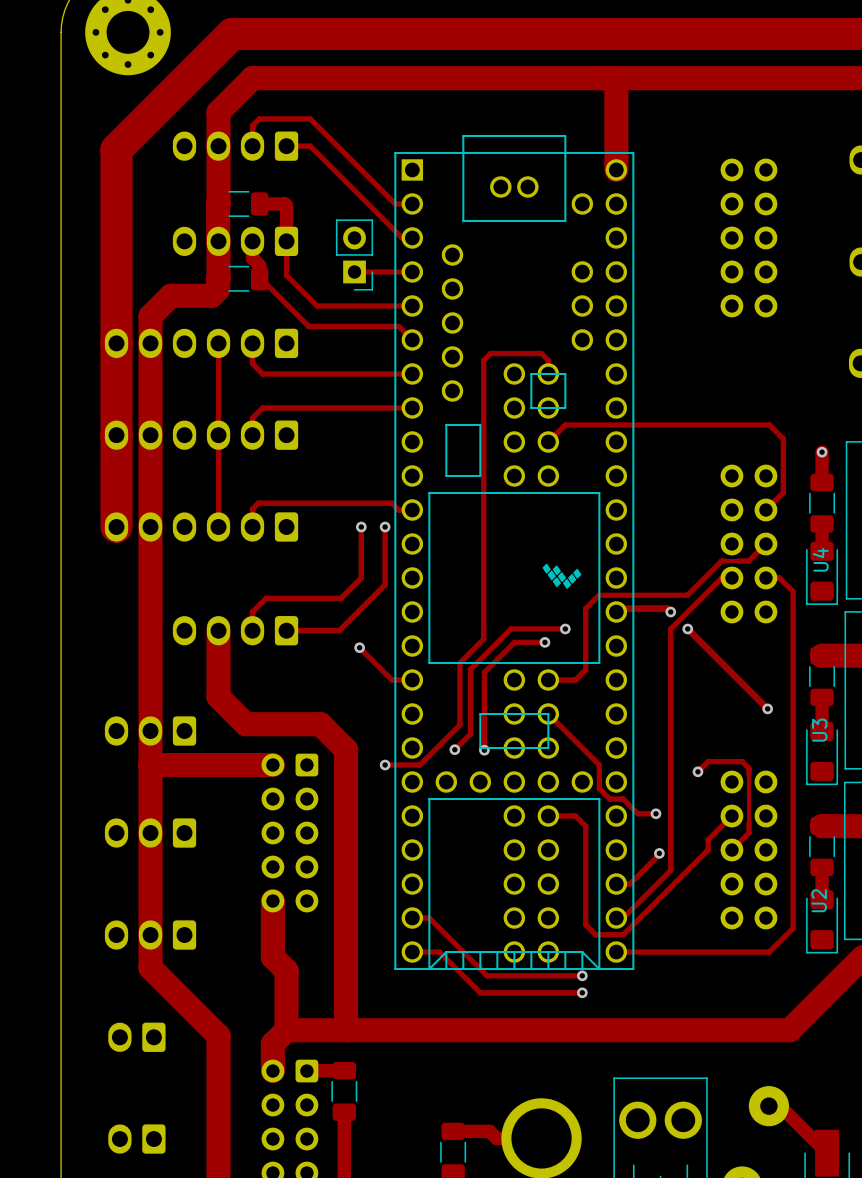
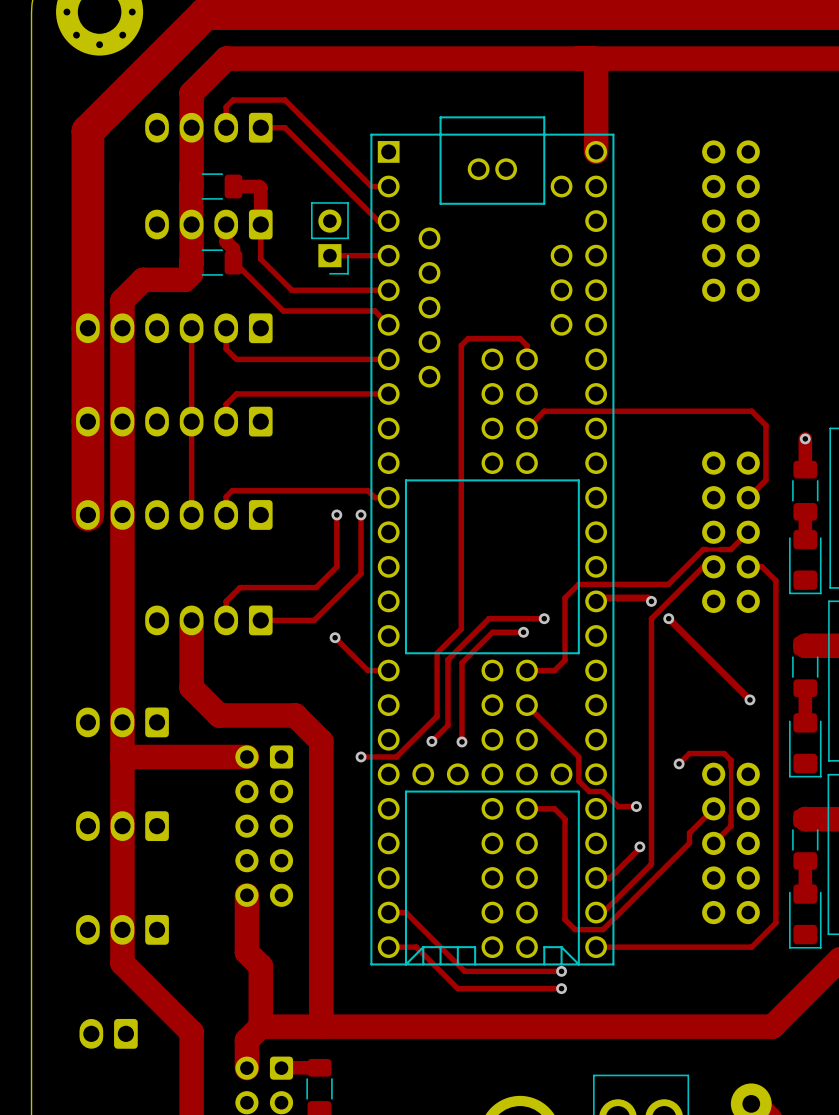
part footprint: [394, 134, 635, 971] -> [370, 116, 615, 966]
U4 name: U4 (820, 559) -> none
U3 name: U3 (819, 730) -> none
U2 name: U2 (819, 900) -> none

